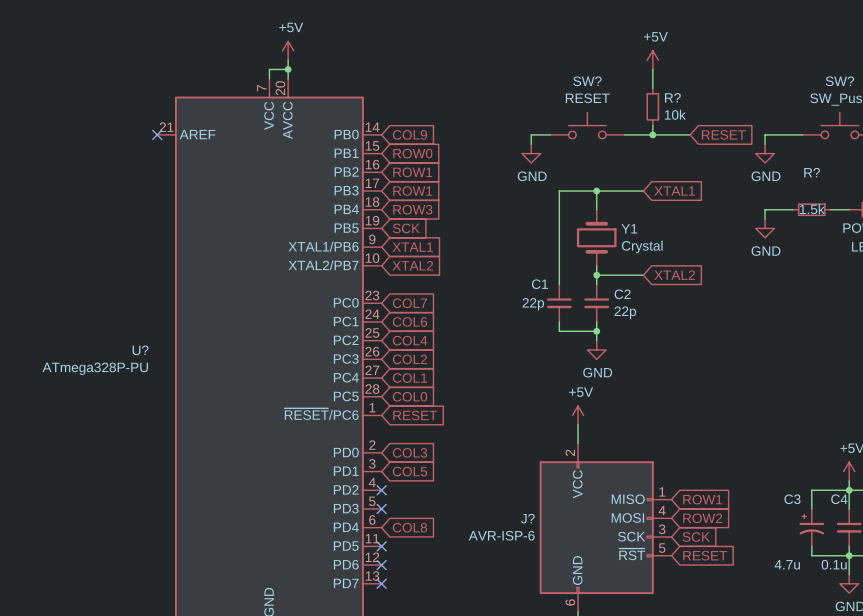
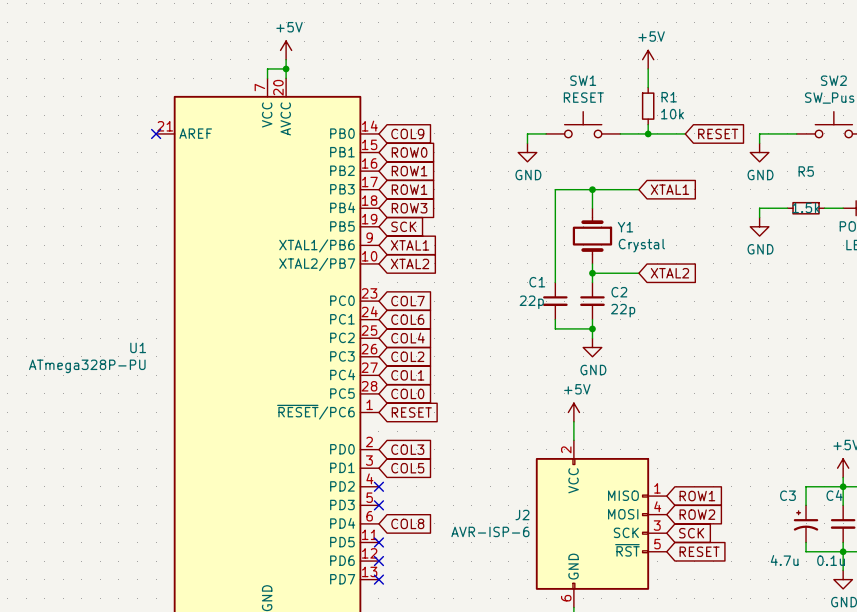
SW? name: SW? (587, 81) -> SW1 (583, 80)
SW? name: SW? (839, 81) -> SW2 (833, 80)
R? name: R? (672, 97) -> R1 (669, 97)
R? name: R? (812, 172) -> R5 (806, 171)
U? name: U? (140, 350) -> U1 (138, 347)
J? name: J? (527, 518) -> J2 (522, 515)

